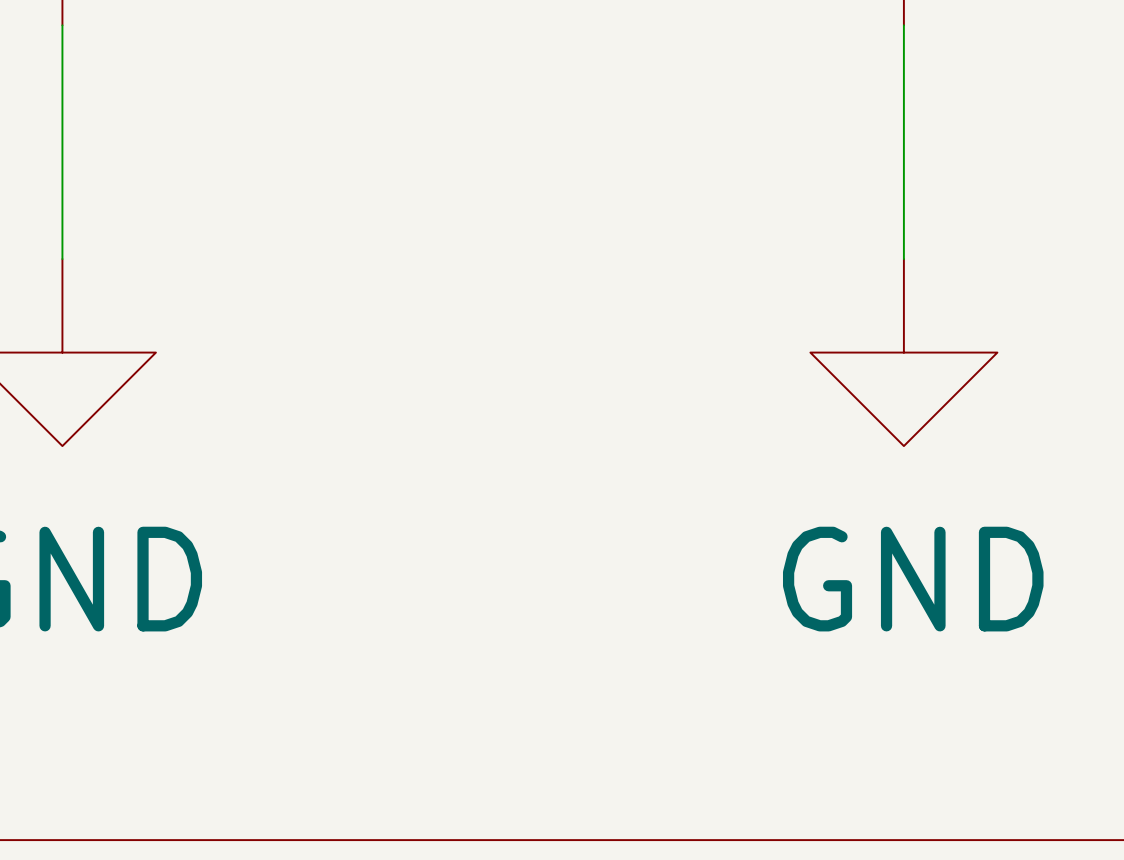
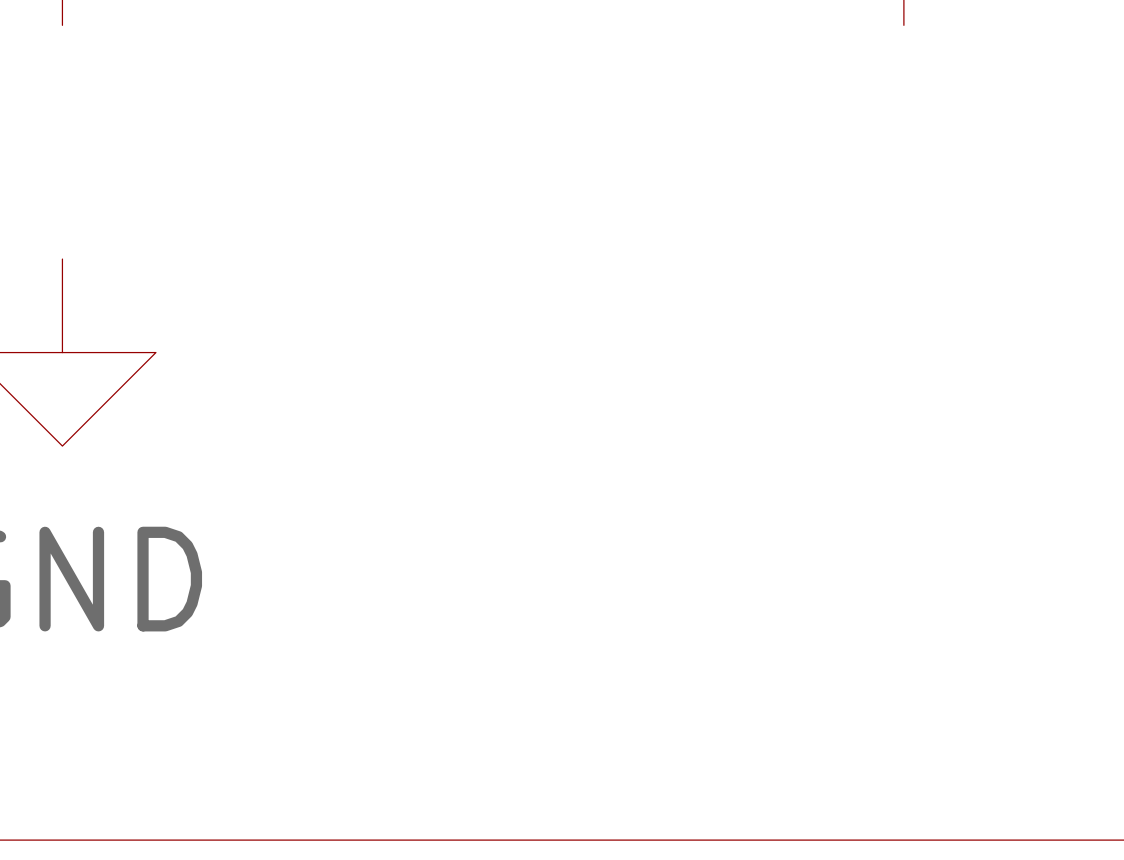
wire: (62, 25) (62, 259) -> none
wire: (903, 25) (903, 259) -> none
power symbol: GND (903, 352) -> none

